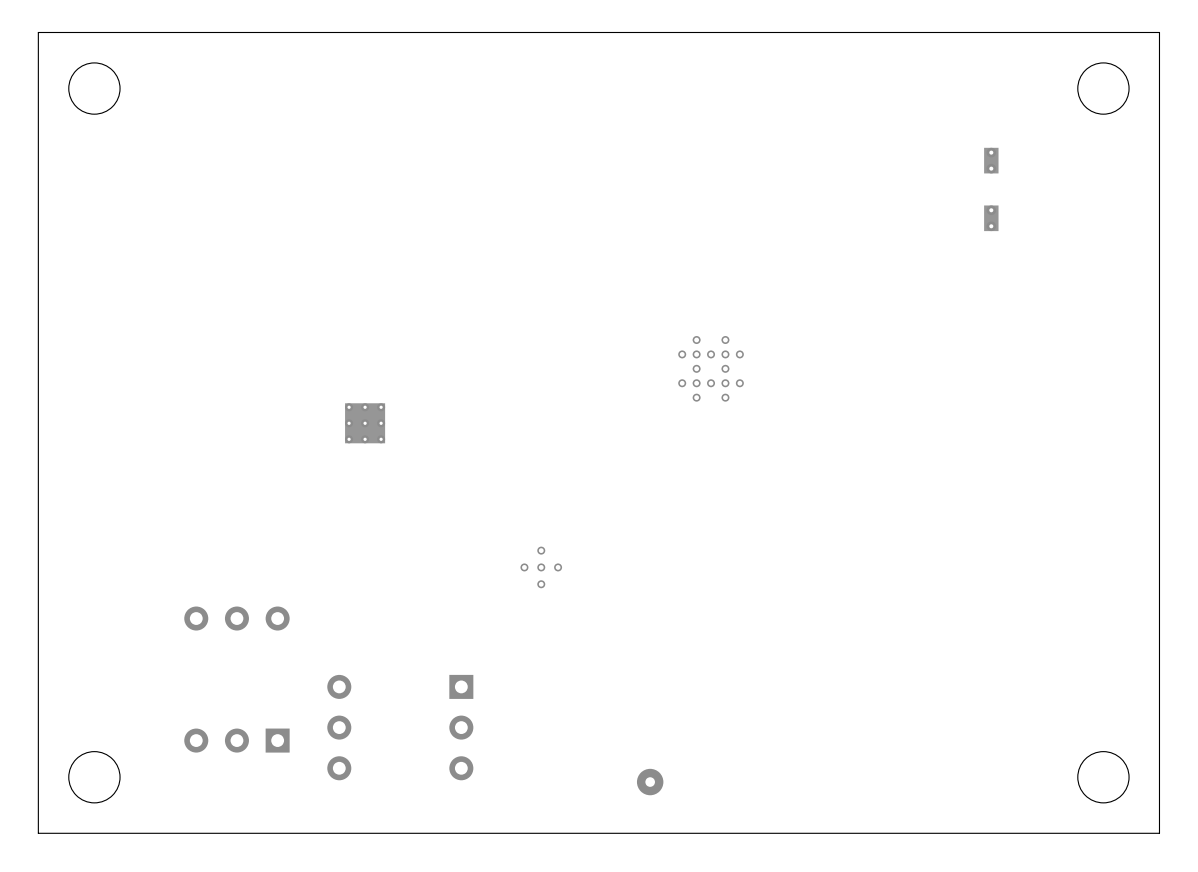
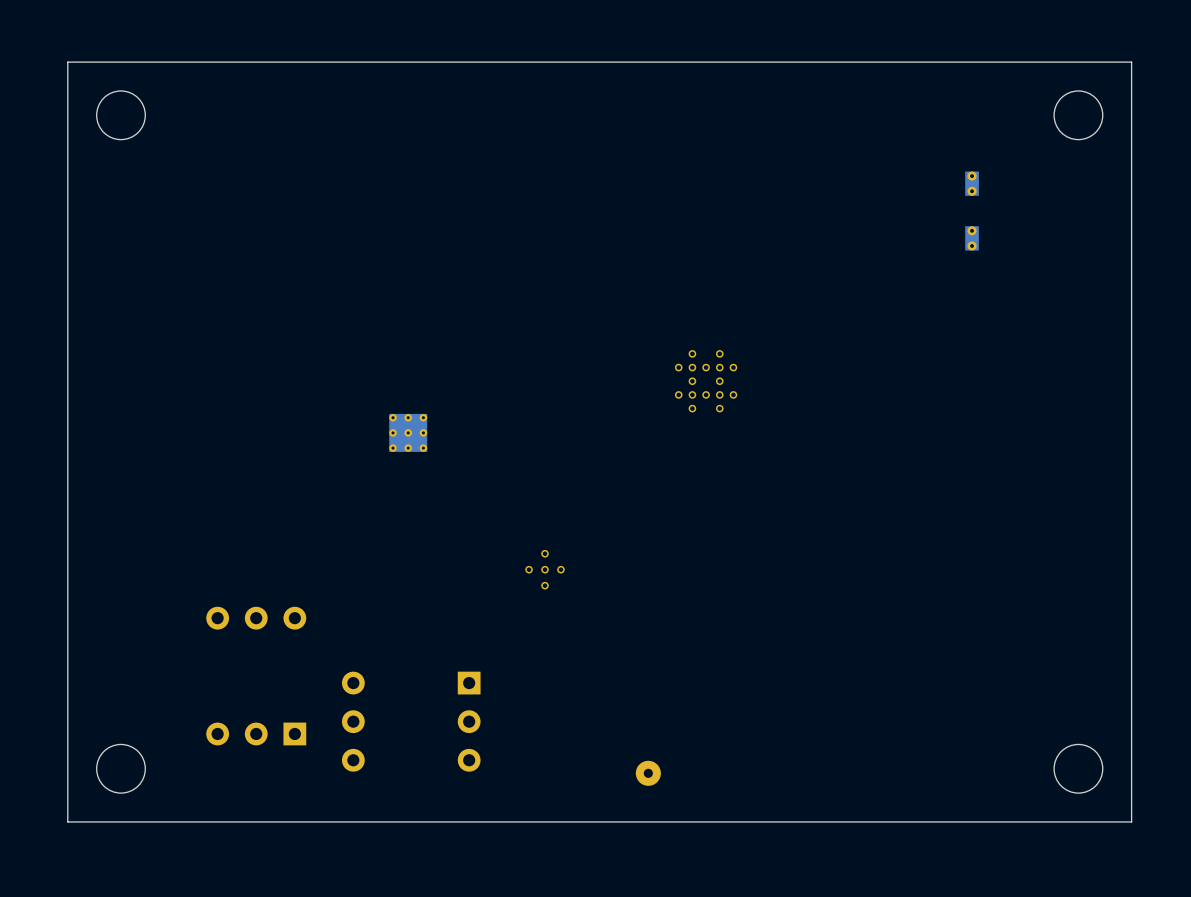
part position: (365, 423) -> (408, 432)

